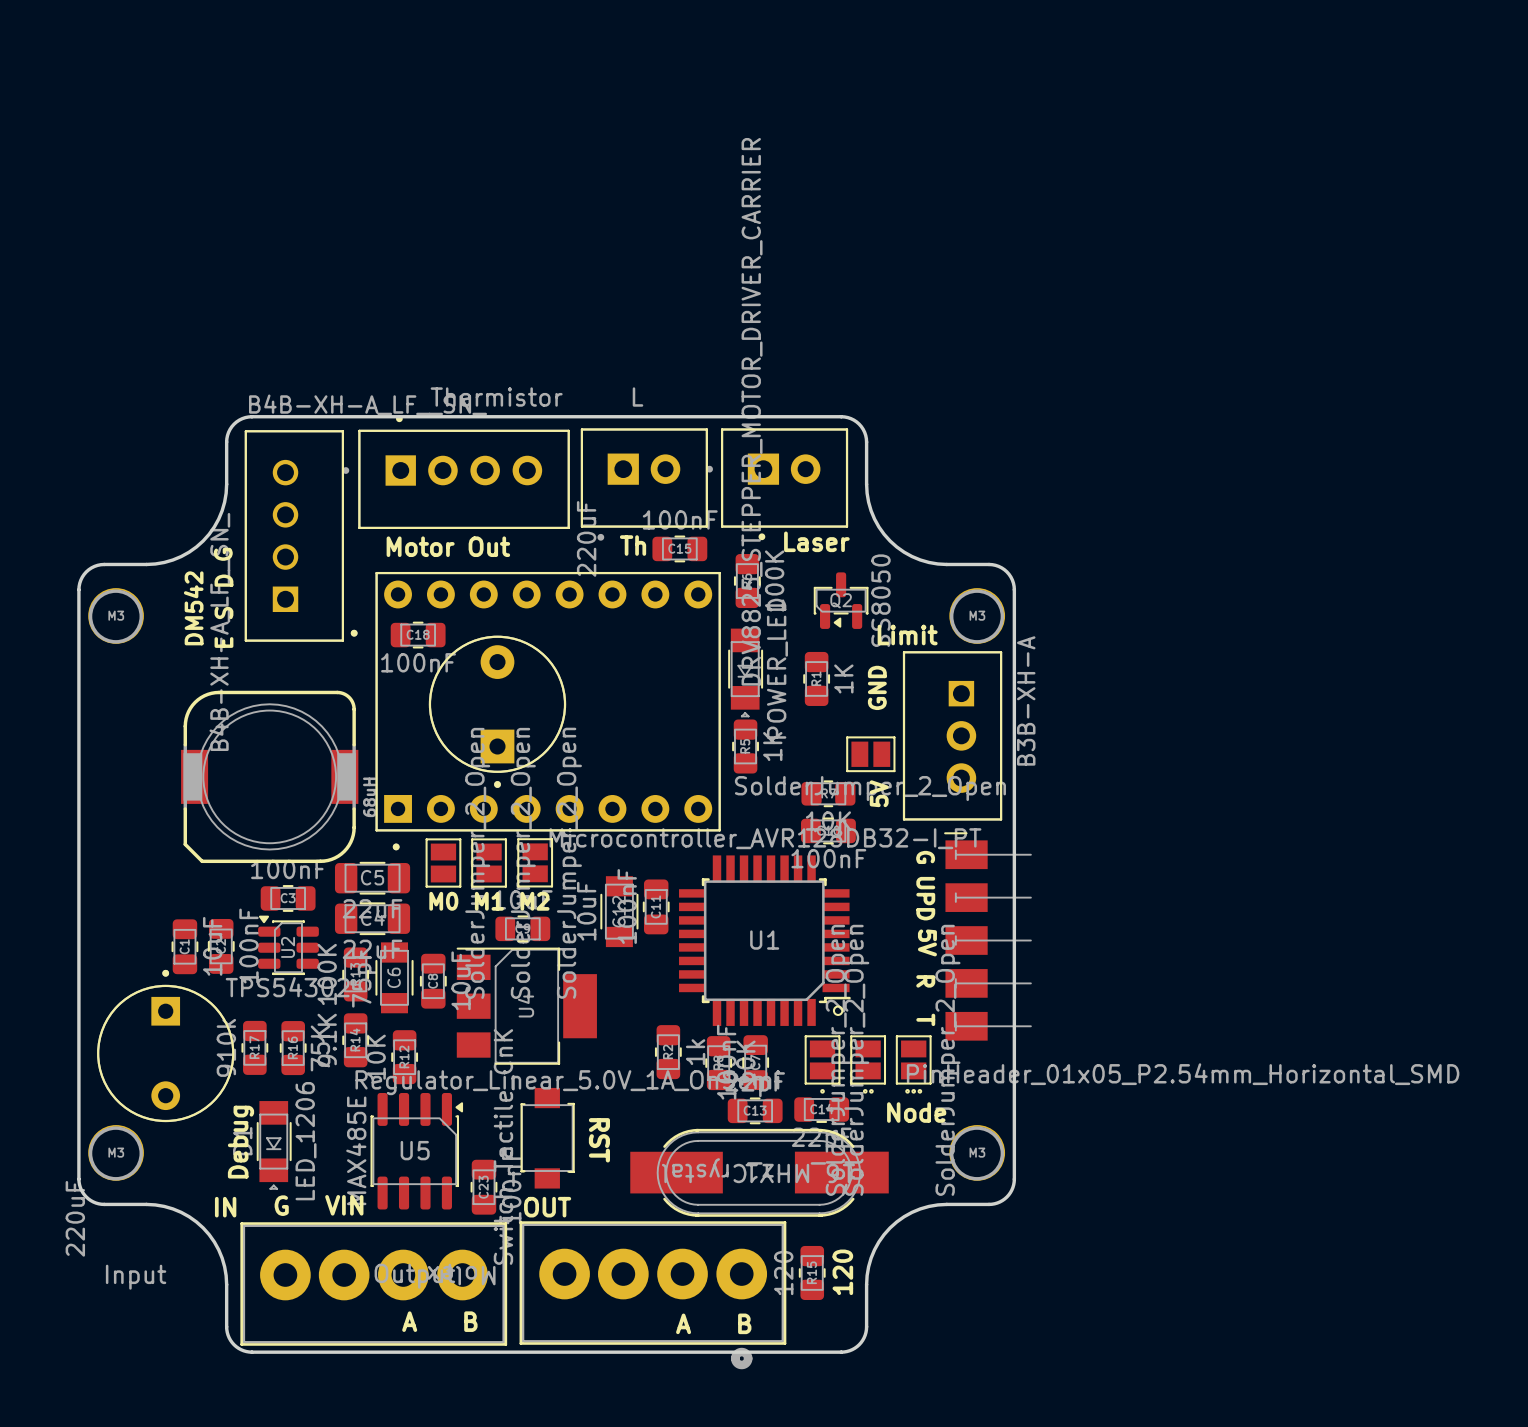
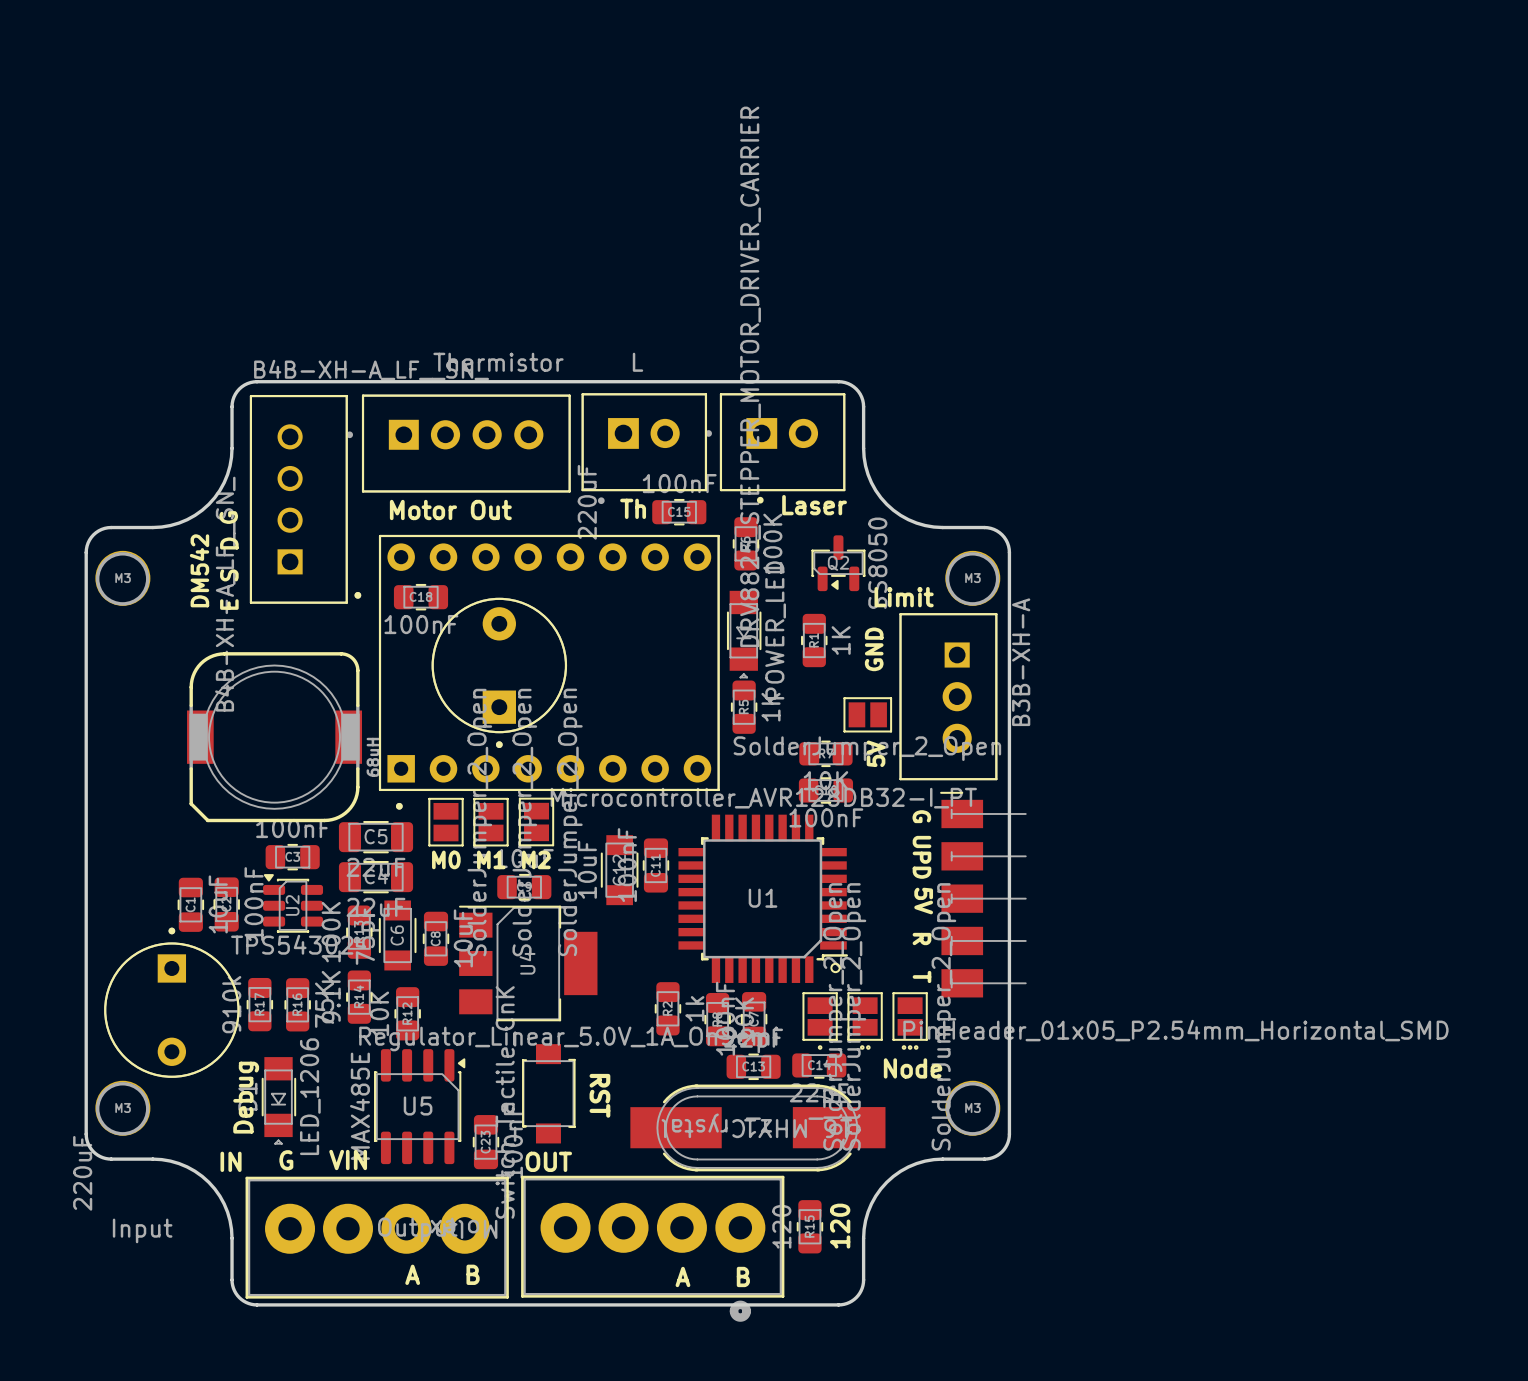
part footprint: [342, 415, 570, 529] -> [346, 394, 571, 493]

